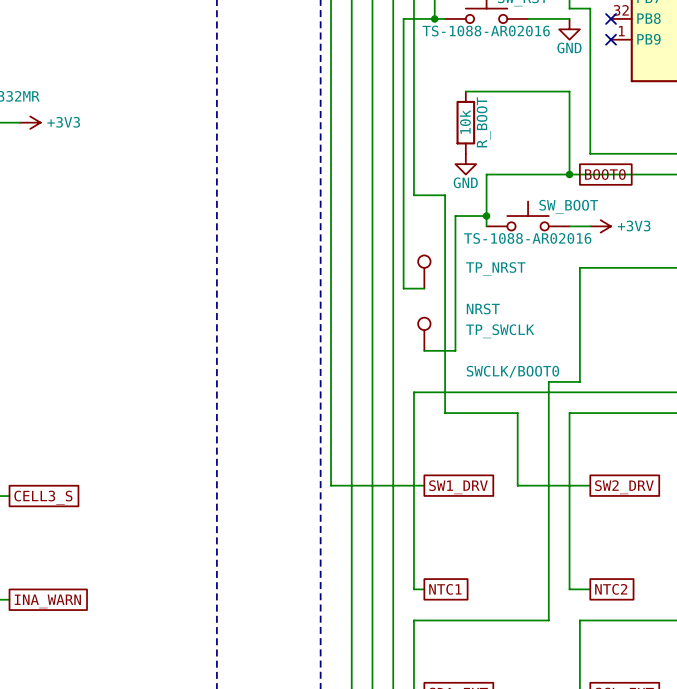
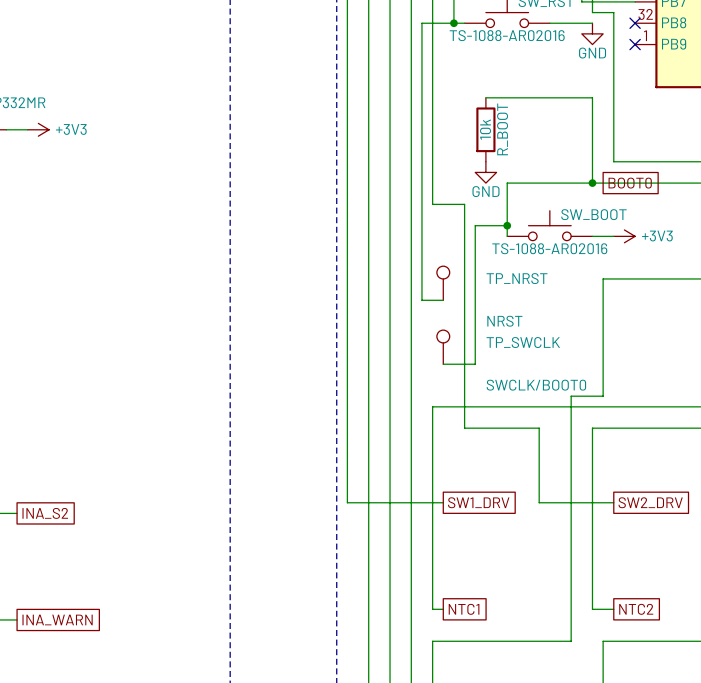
global label: CELL3_S (43, 497) -> INA_S2 (45, 513)

